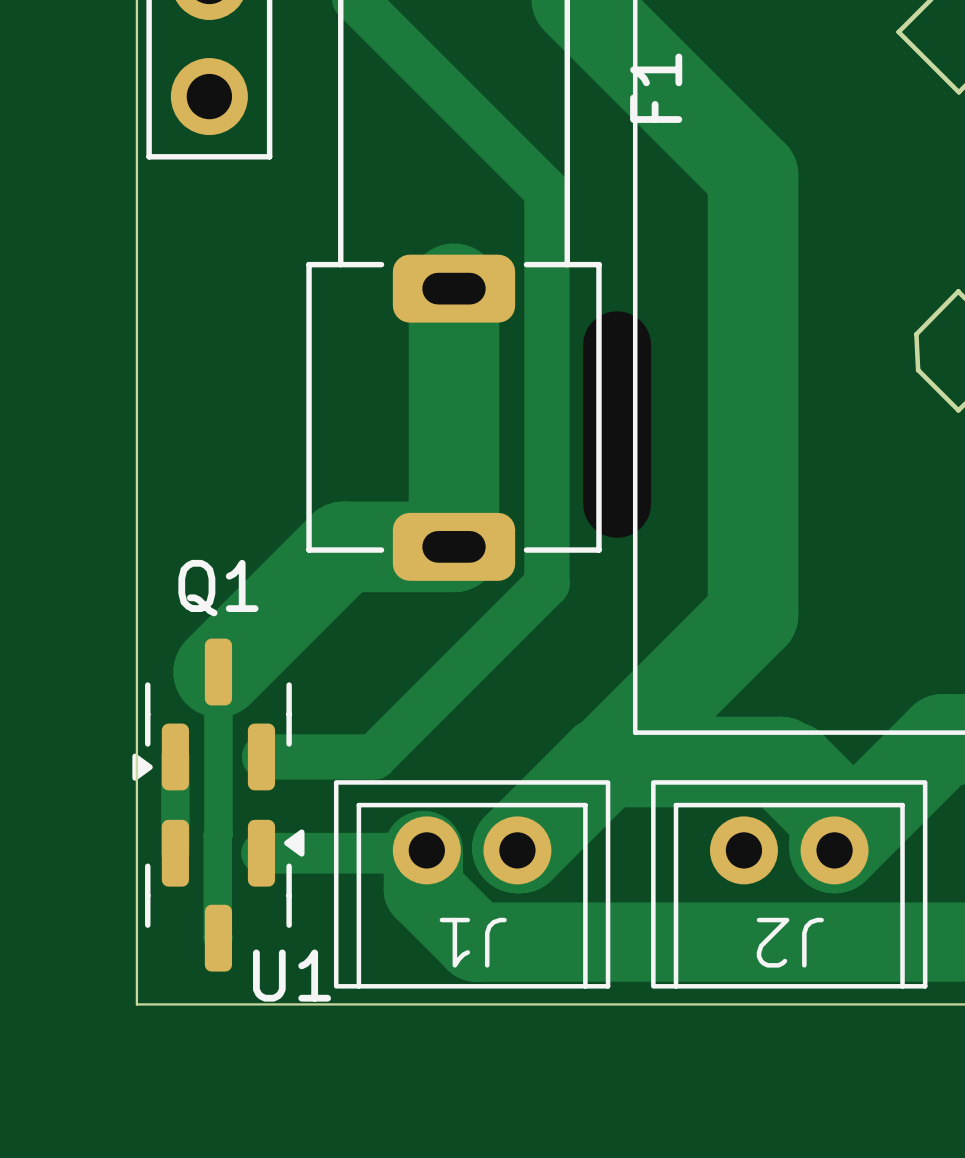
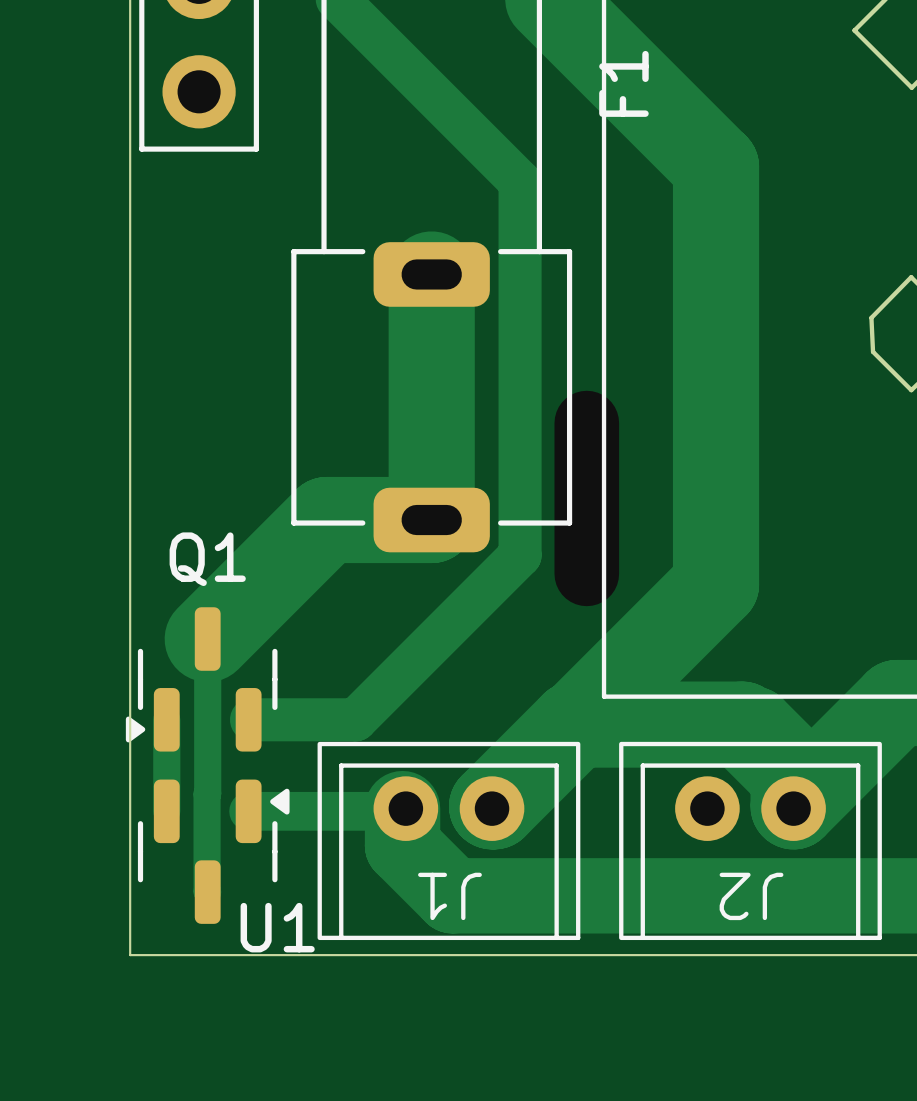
part position: (617, 424) -> (586, 498)

